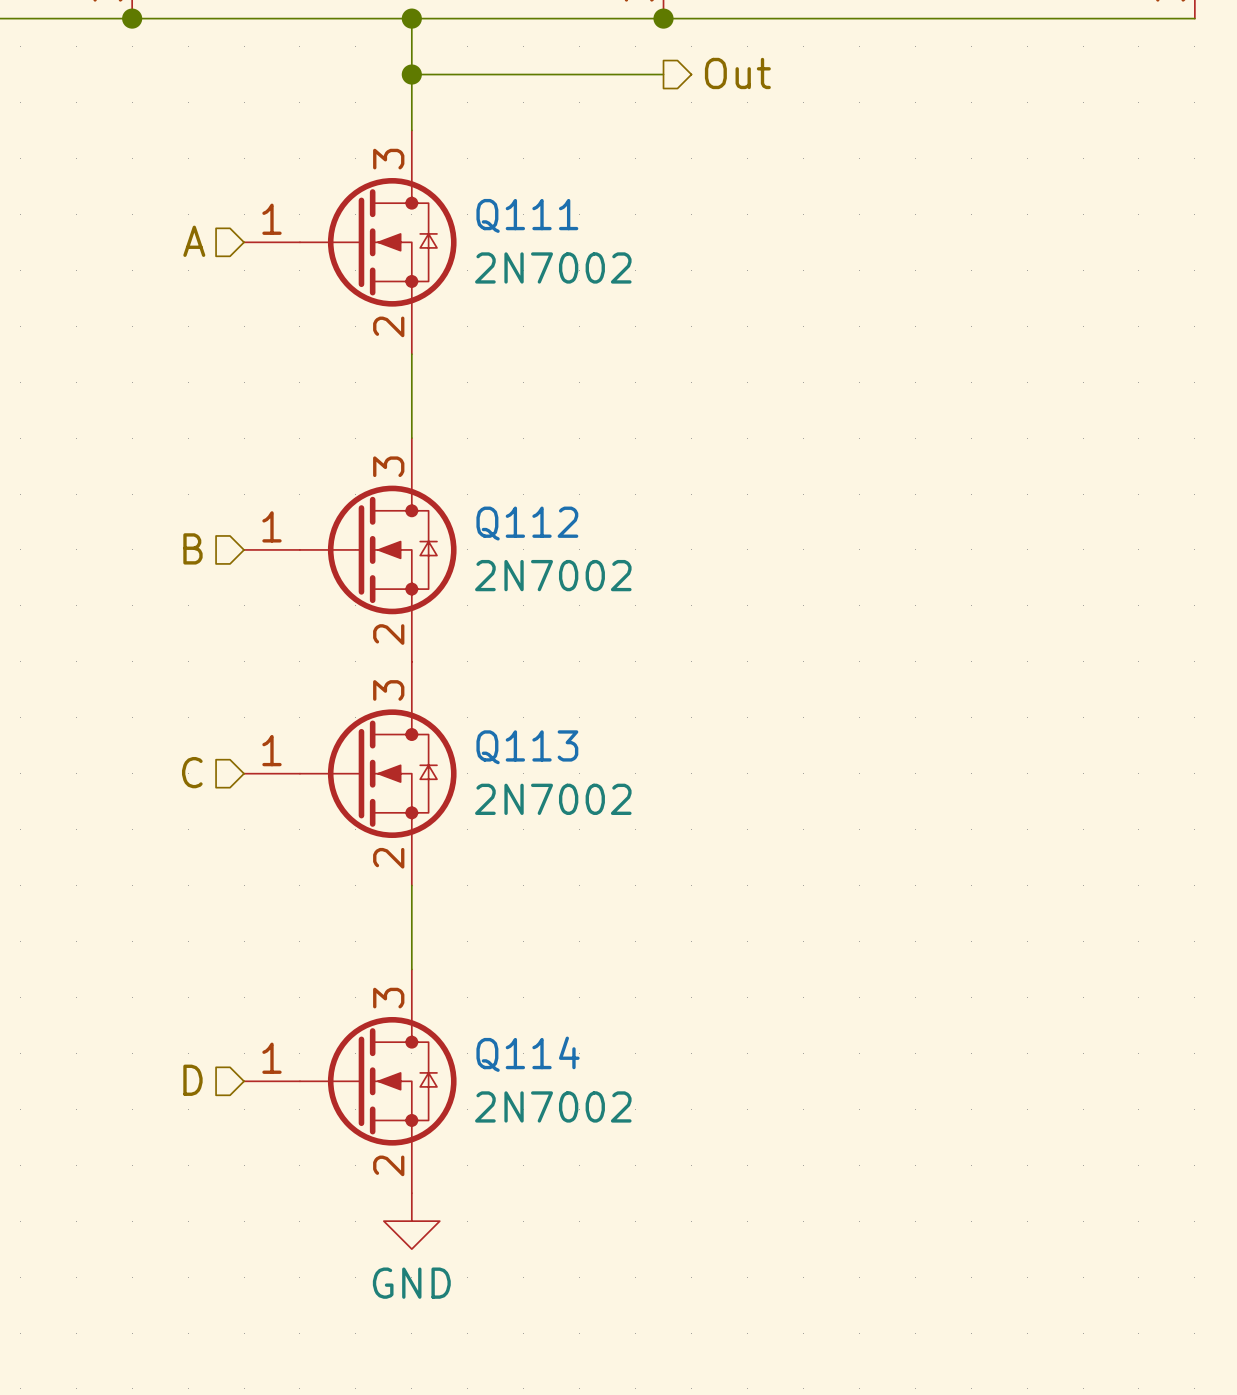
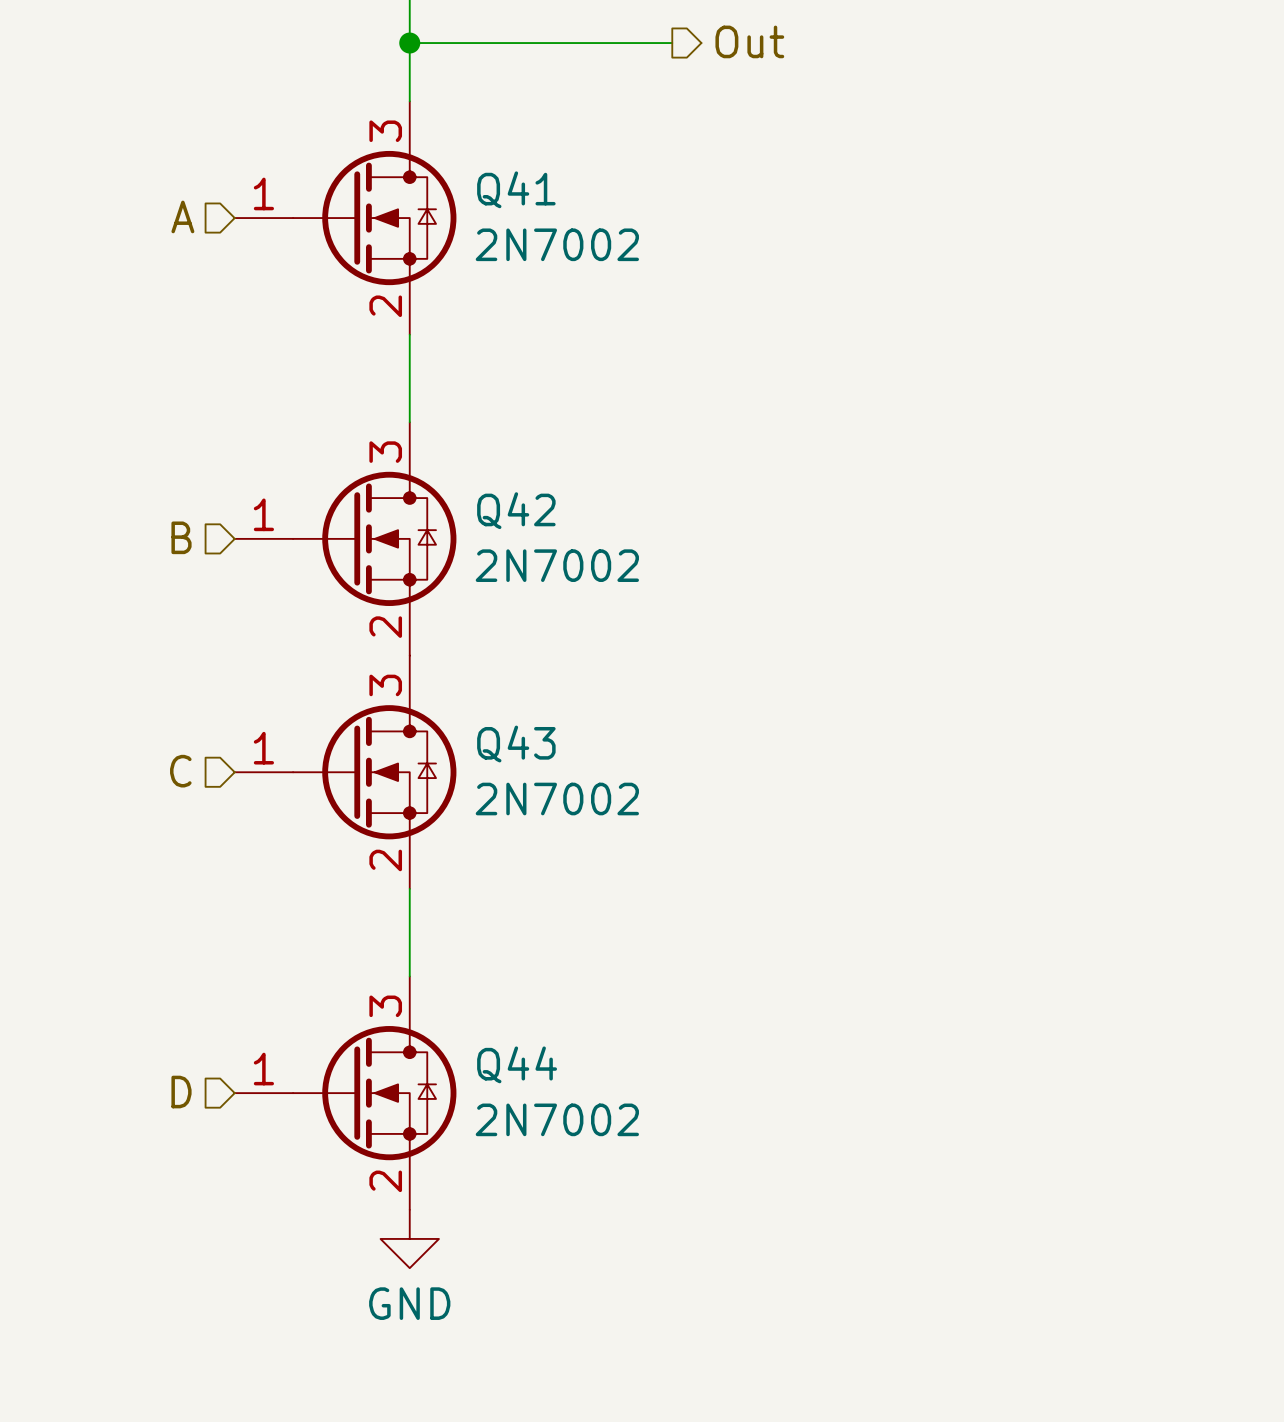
Q111 name: Q111 (527, 215) -> Q41 (516, 189)
Q112 name: Q112 (527, 523) -> Q42 (516, 510)
Q113 name: Q113 (527, 747) -> Q43 (516, 744)
Q114 name: Q114 (528, 1054) -> Q44 (517, 1064)

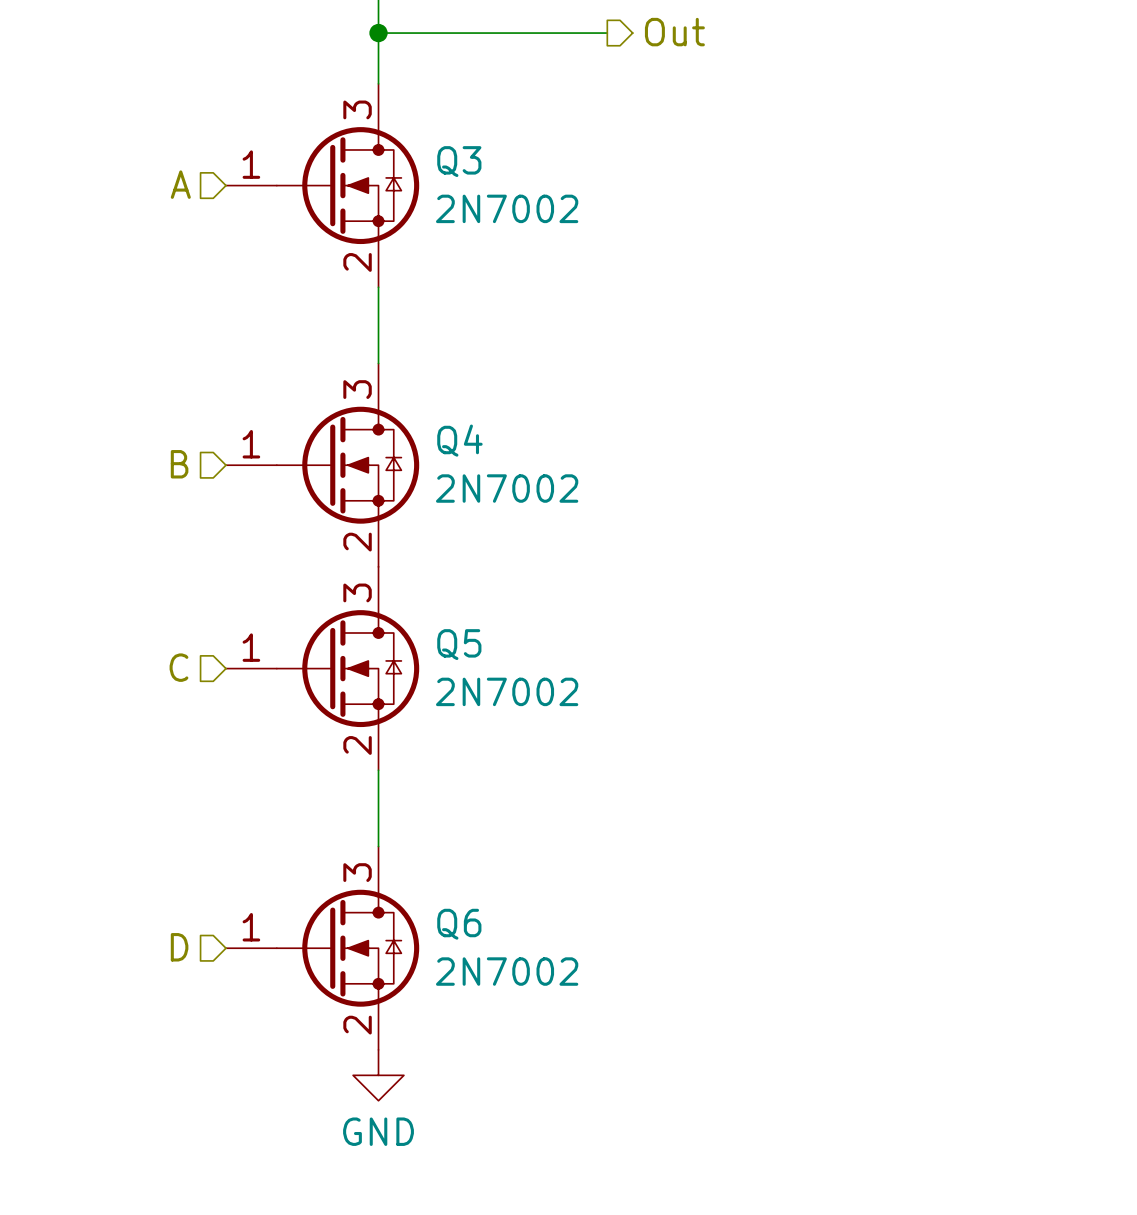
Q41 name: Q41 (516, 189) -> Q3 (459, 161)
Q42 name: Q42 (516, 510) -> Q4 (459, 440)
Q43 name: Q43 (516, 744) -> Q5 (459, 644)
Q44 name: Q44 (517, 1064) -> Q6 (459, 924)

